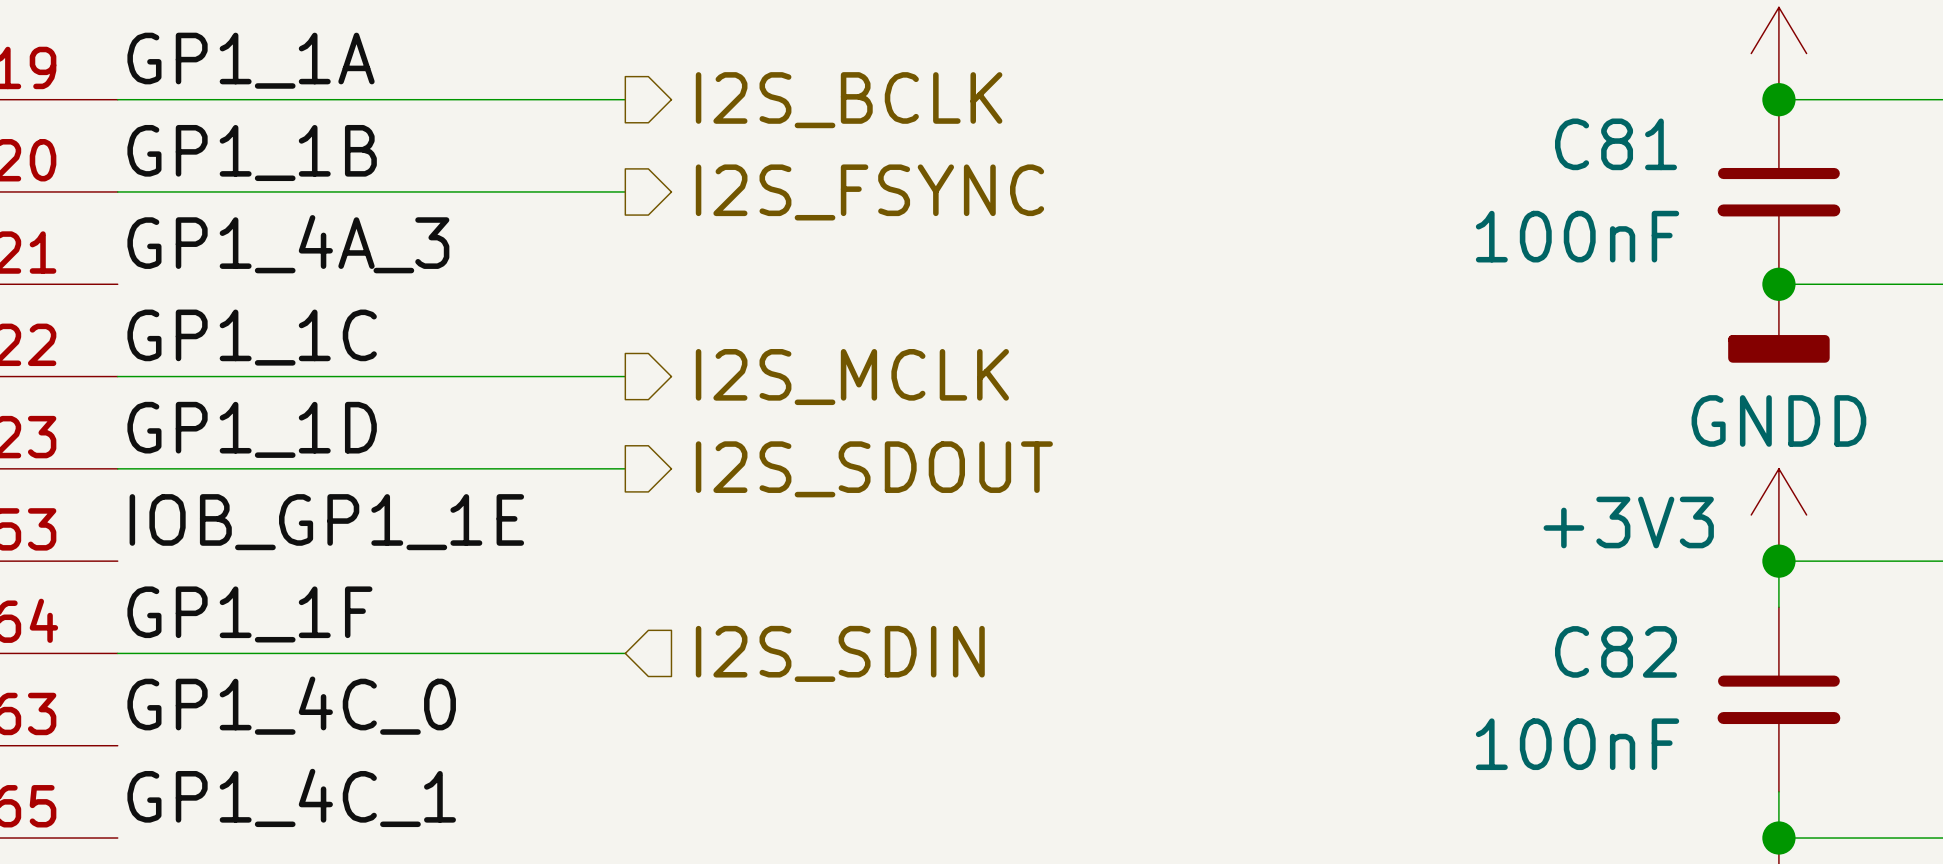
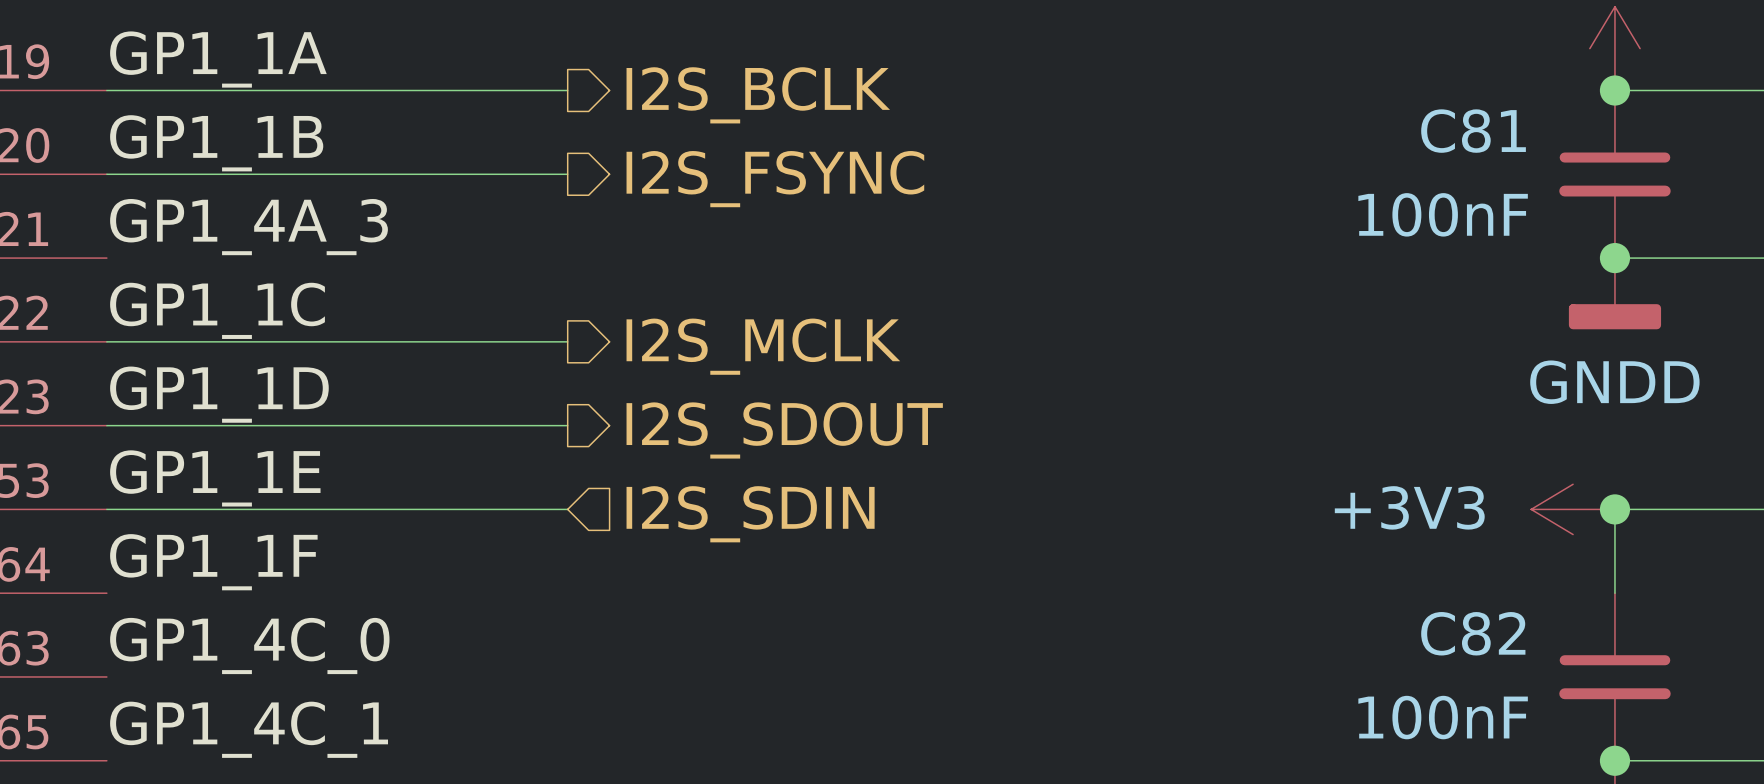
power symbol rotation: 0° (1778, 514) -> 90° counterclockwise (1573, 509)
power symbol position: +3V3 (1778, 514) -> +3V3 (1573, 509)
label: IOB_GP1_1E (326, 522) -> GP1_1E (215, 478)
wire: (117, 653) (625, 653) -> (106, 509) (567, 509)
hierarchical label position: I2S_SDIN (840, 653) -> I2S_SDIN (750, 514)
C82 position: (1778, 699) -> (1614, 676)

